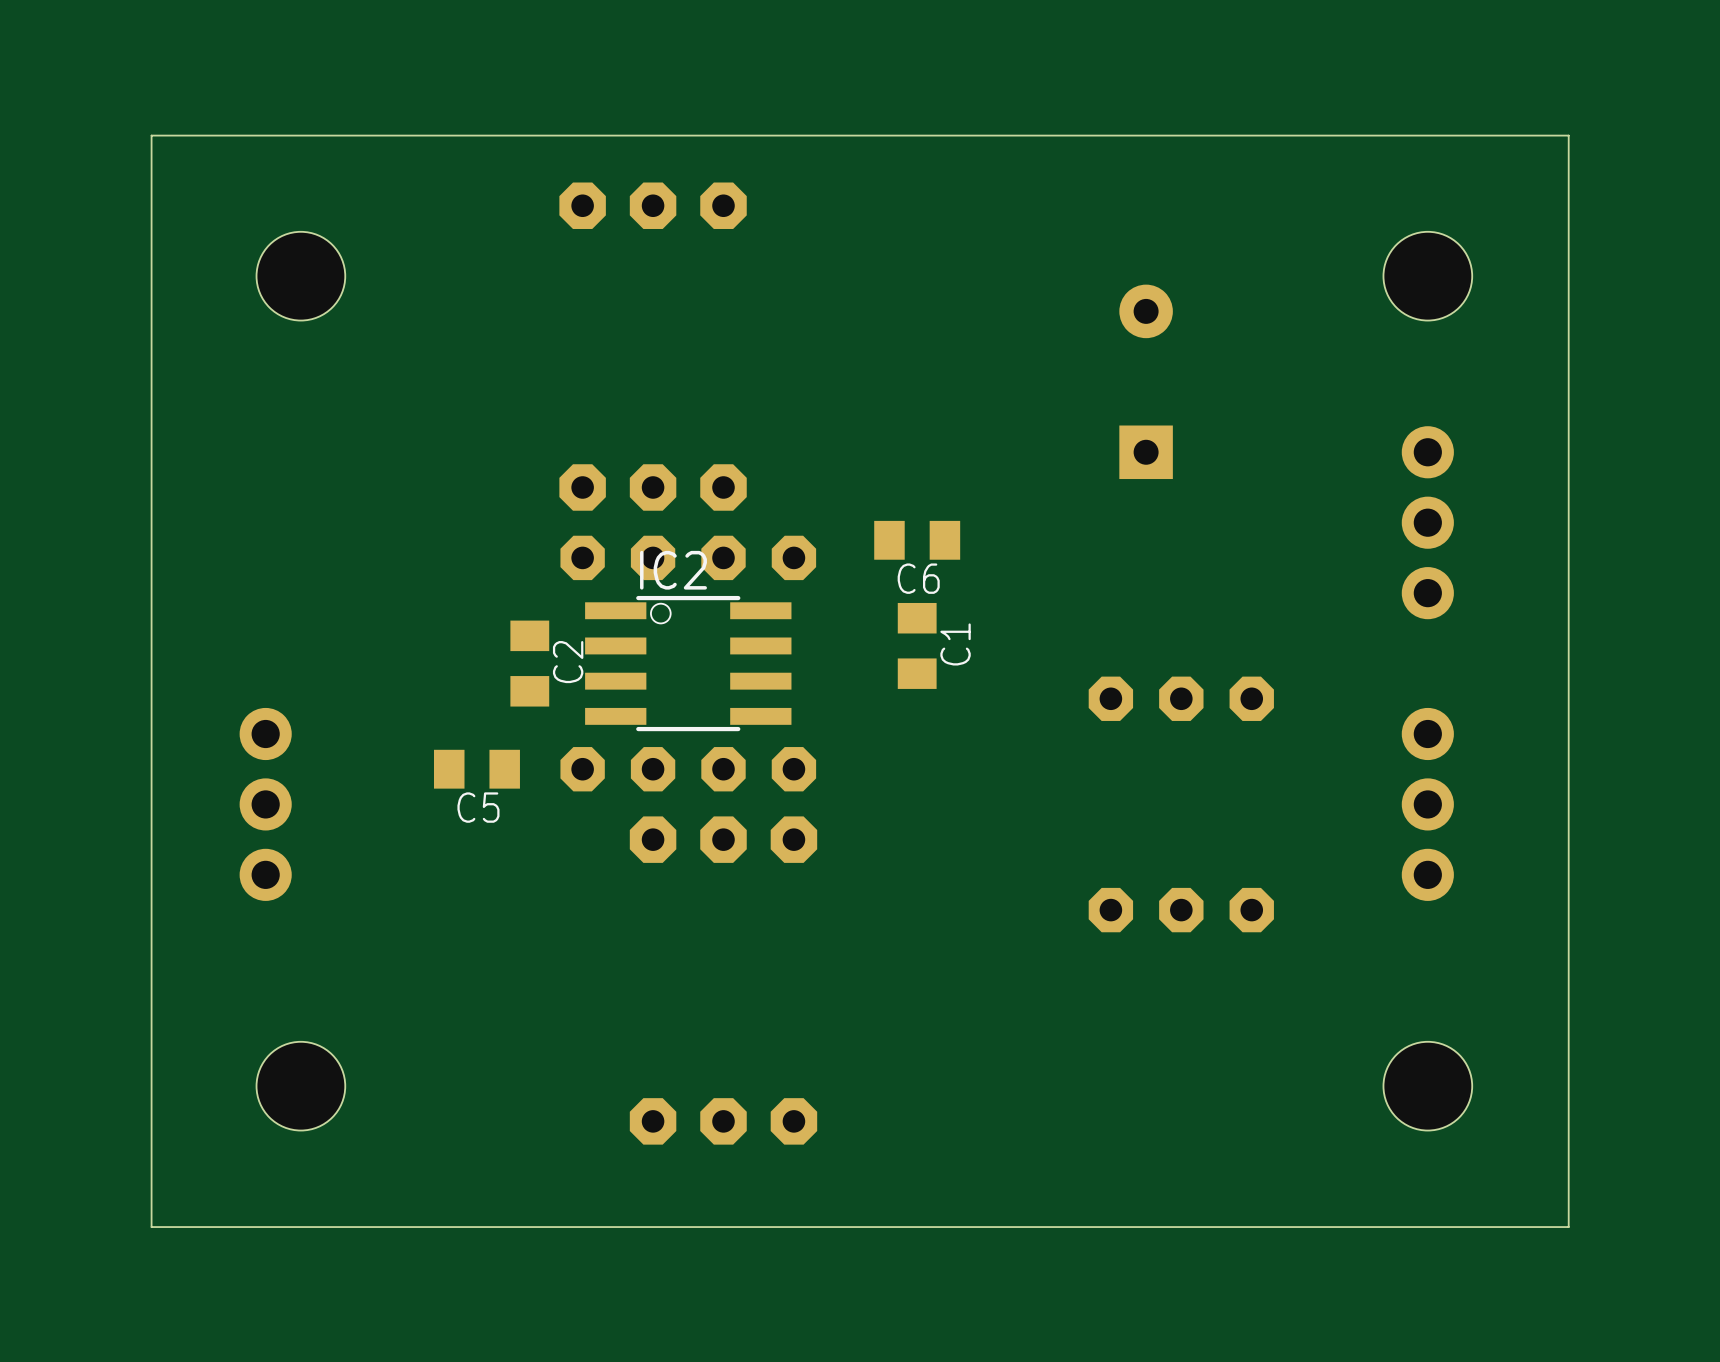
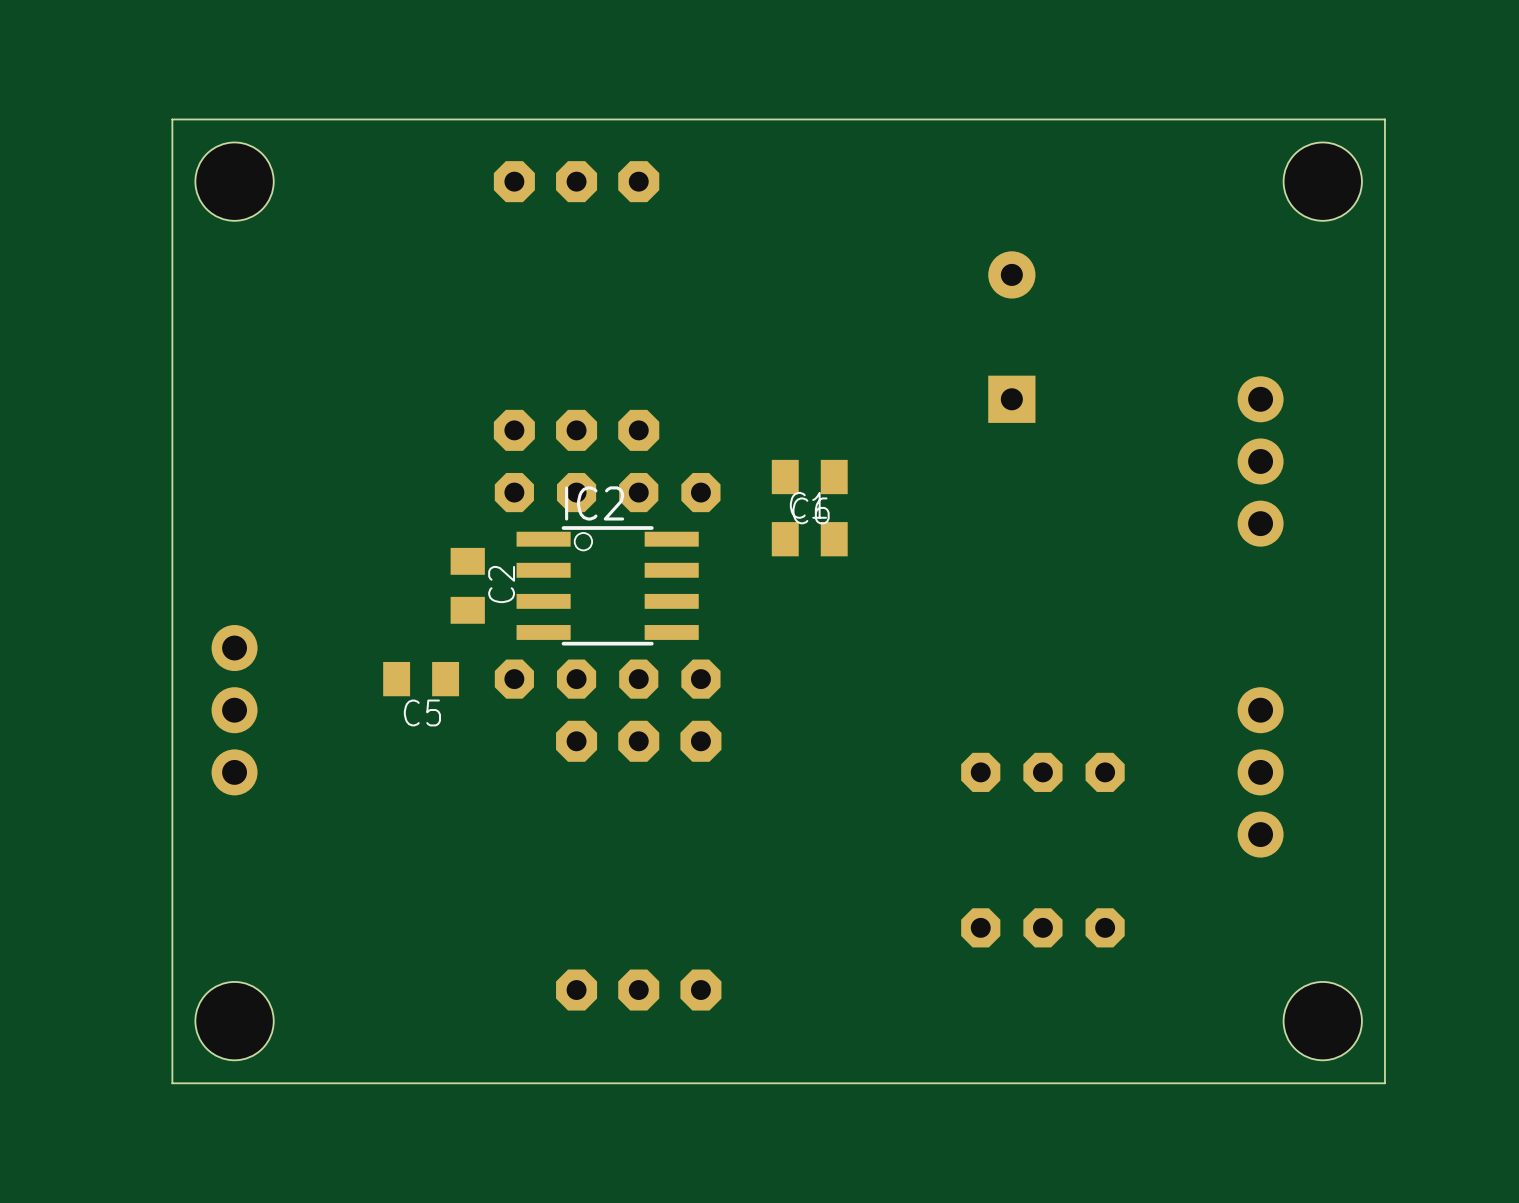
board edge: (1568, 135) (151, 135) (151, 1227) (195, 1227) -> (1384, 119) (172, 119) (172, 1083)
hole position: (300, 276) -> (234, 181)
hole position: (1427, 276) -> (1322, 181)
C1 rotation: 0° (917, 645) -> 90° clockwise (809, 539)
part: (1181, 698) -> none
part position: (1427, 804) -> (1260, 772)
part position: (1181, 910) -> (1042, 772)
part: none -> (1042, 927)
hole position: (300, 1086) -> (234, 1021)
hole position: (1427, 1086) -> (1322, 1021)

